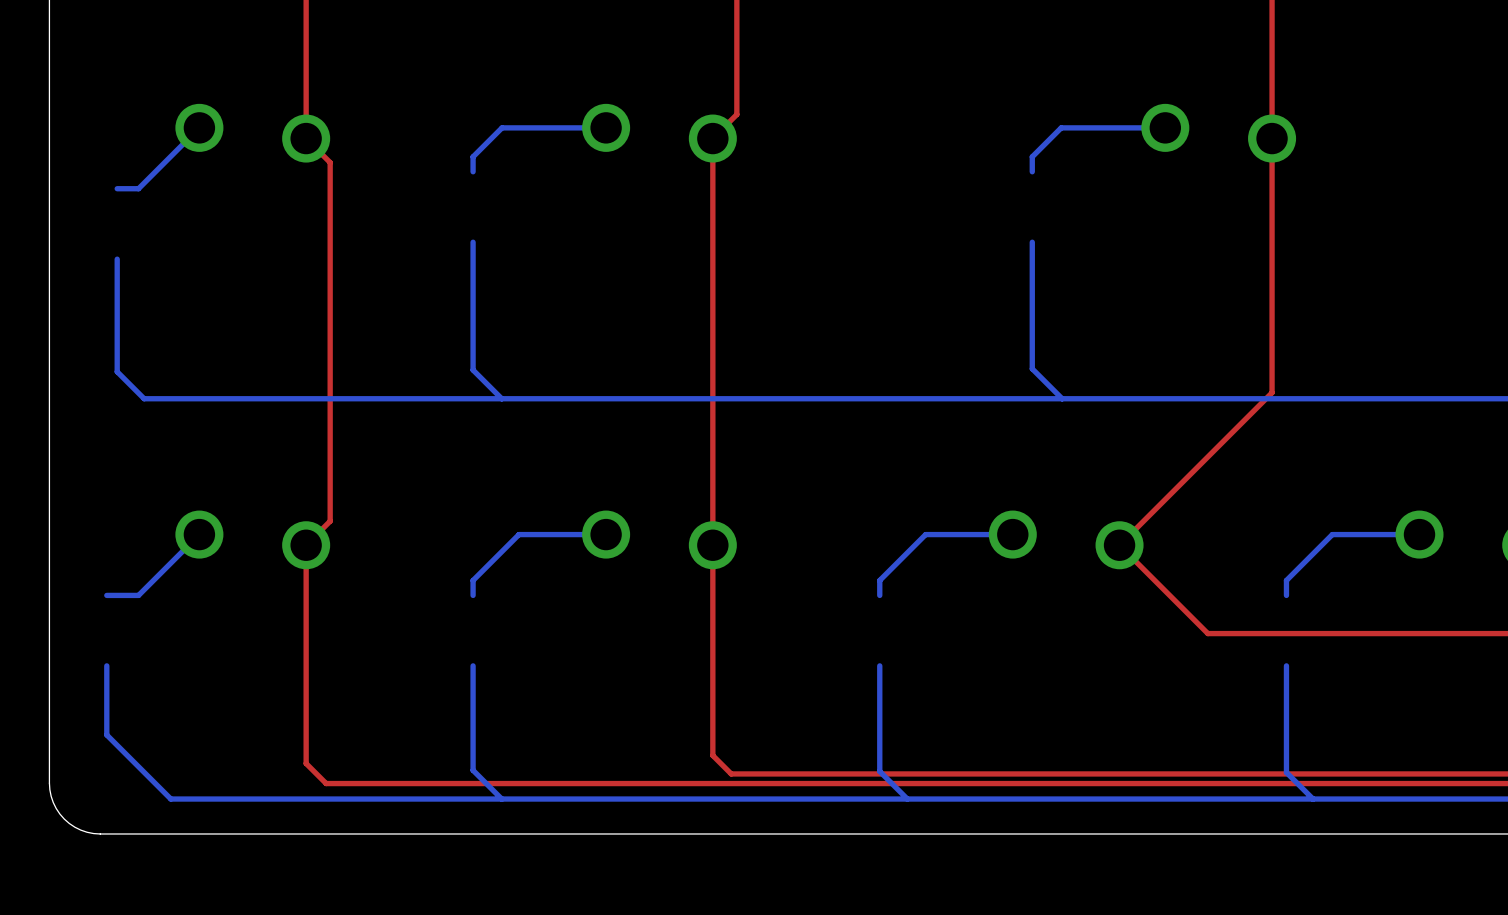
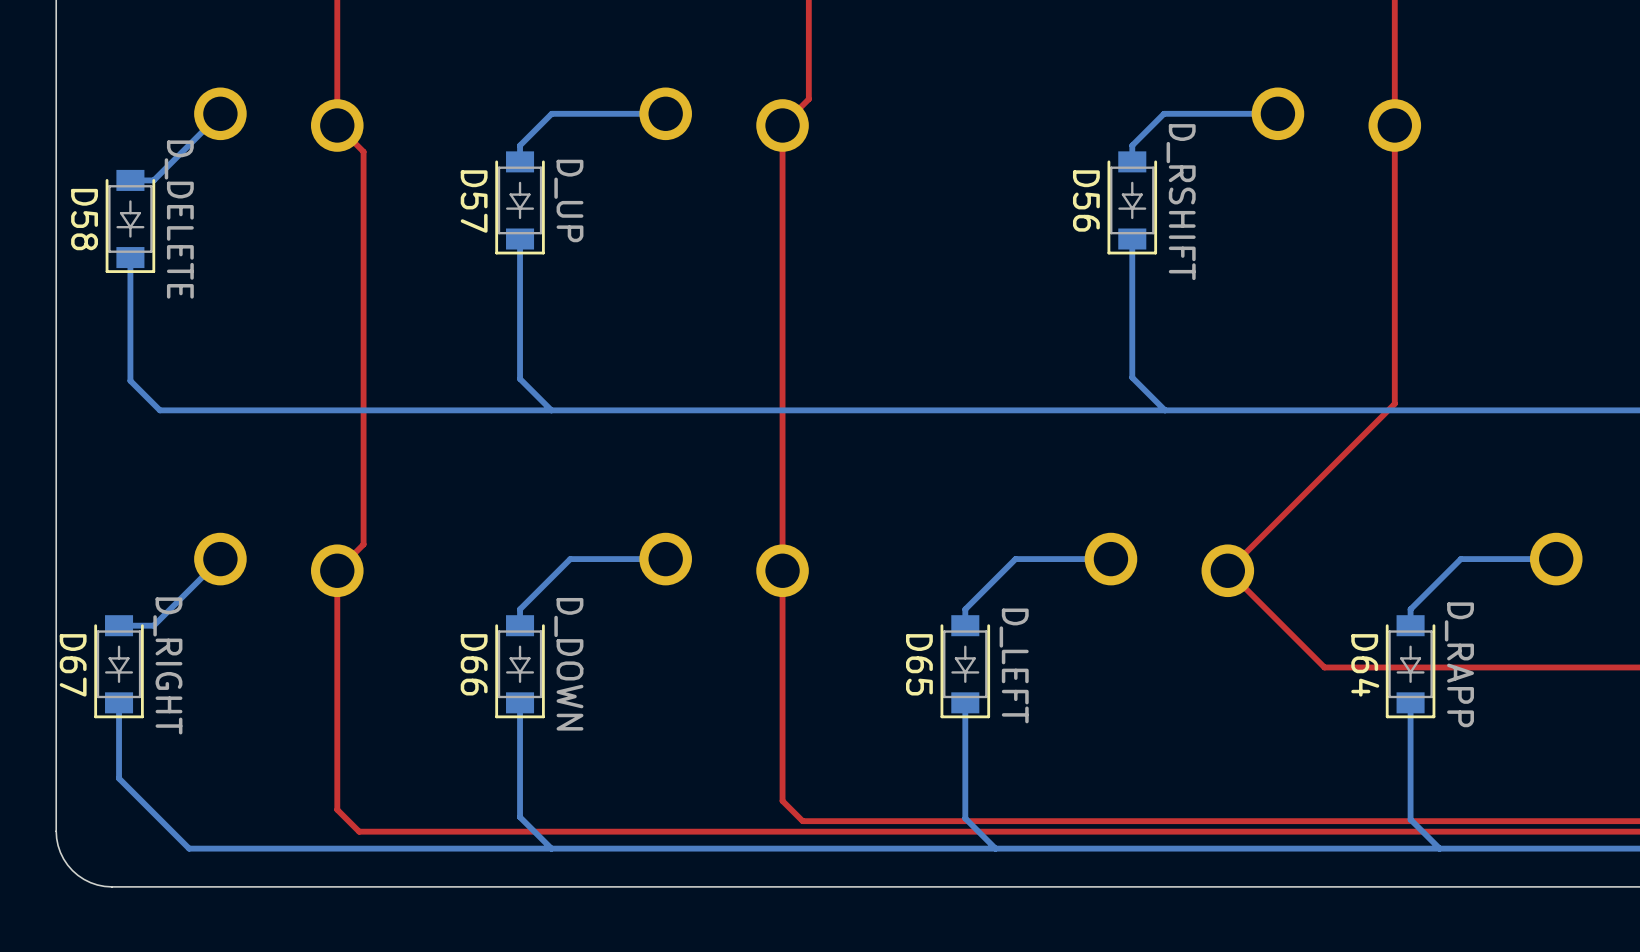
D57: none -> D_UP (520, 202)
D56: none -> D_RSHIFT (1132, 202)
D58: none -> D_DELETE (130, 221)
D67: none -> D_RIGHT (119, 666)
D66: none -> D_DOWN (520, 666)
D65: none -> D_LEFT (965, 666)
D64: none -> D_RAPP (1410, 666)

